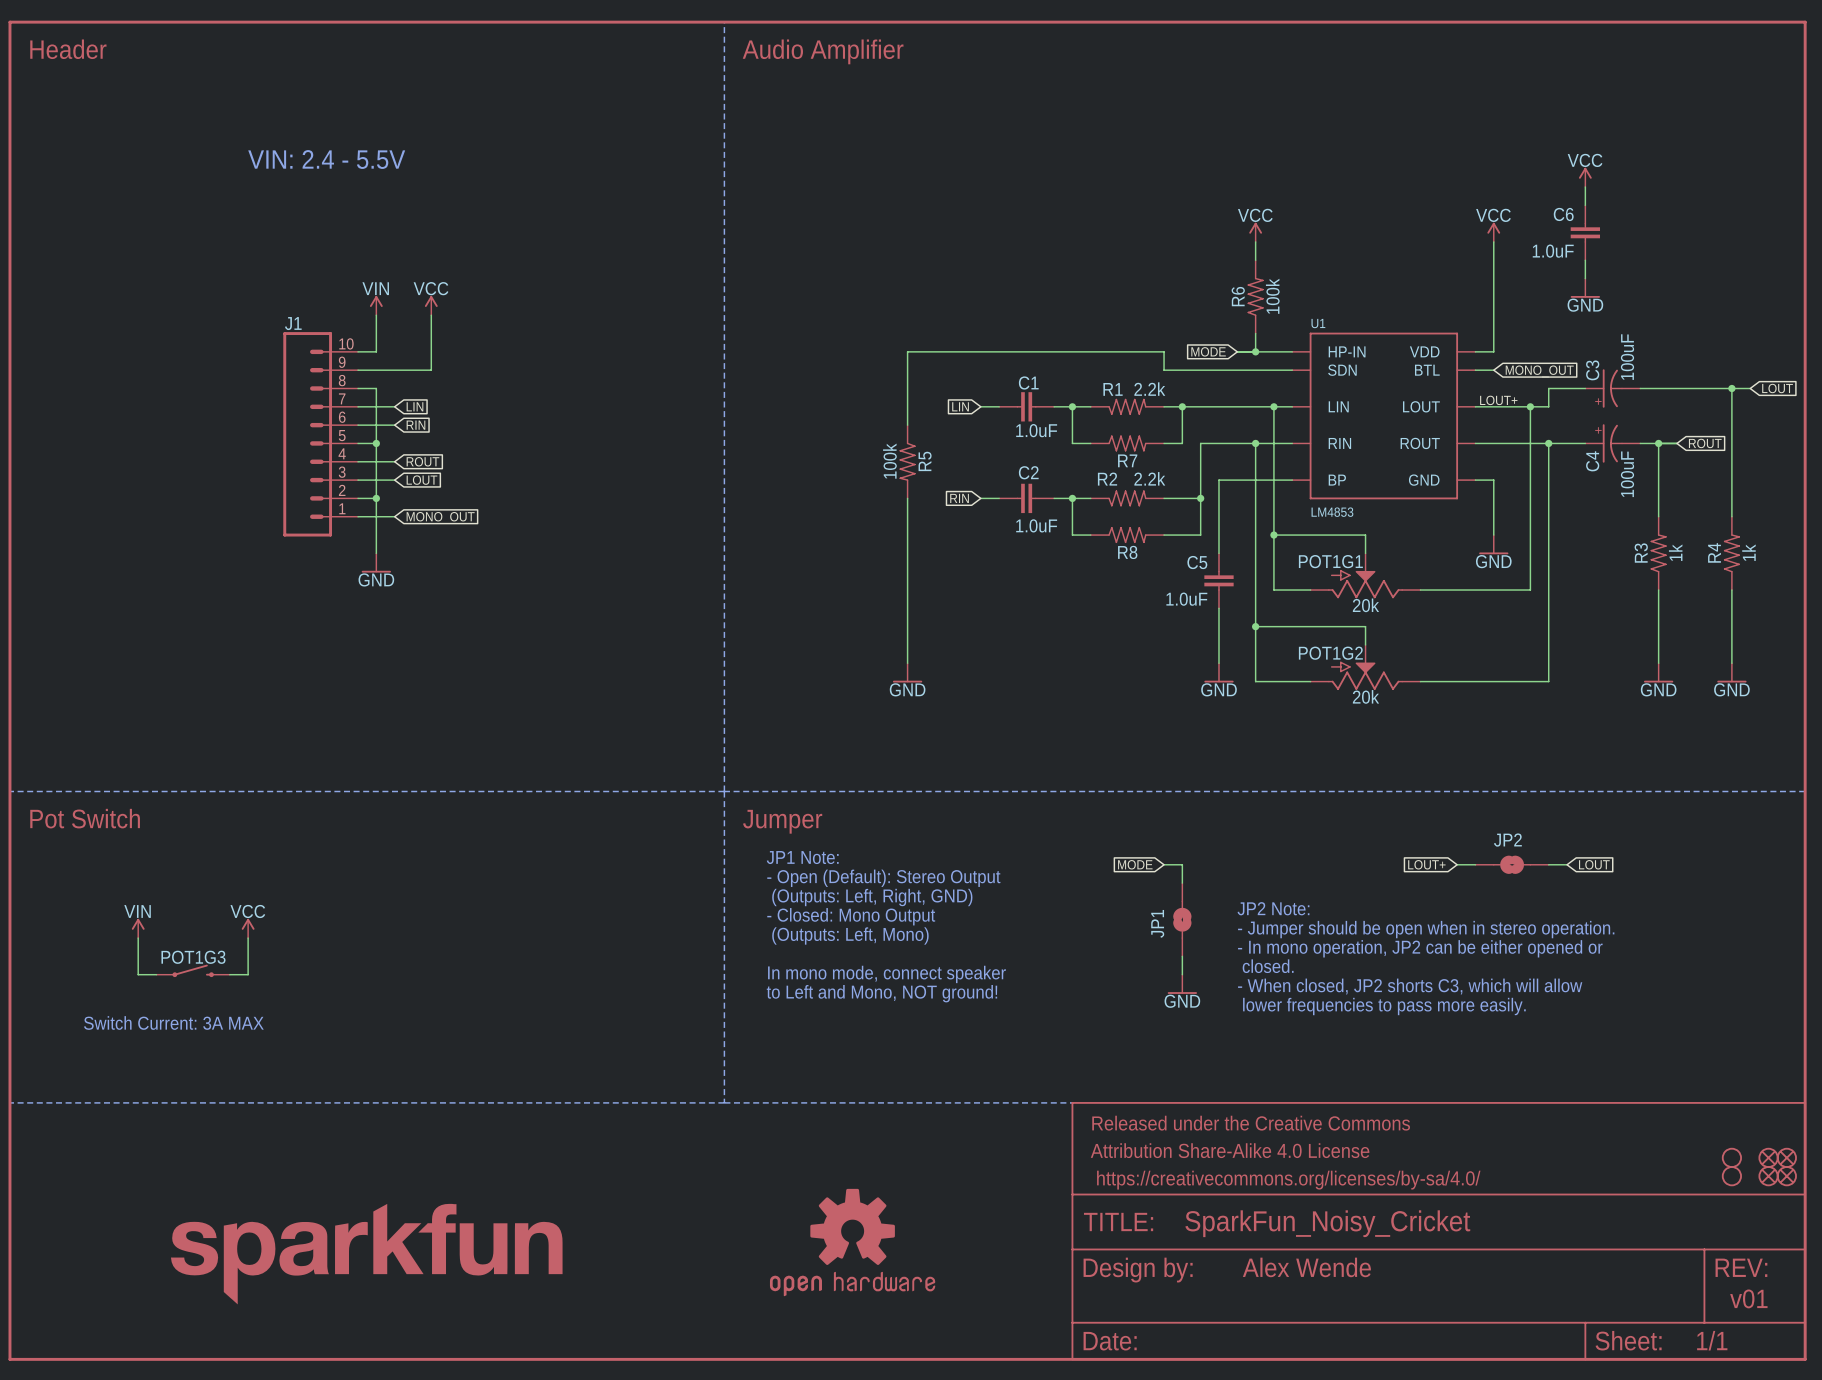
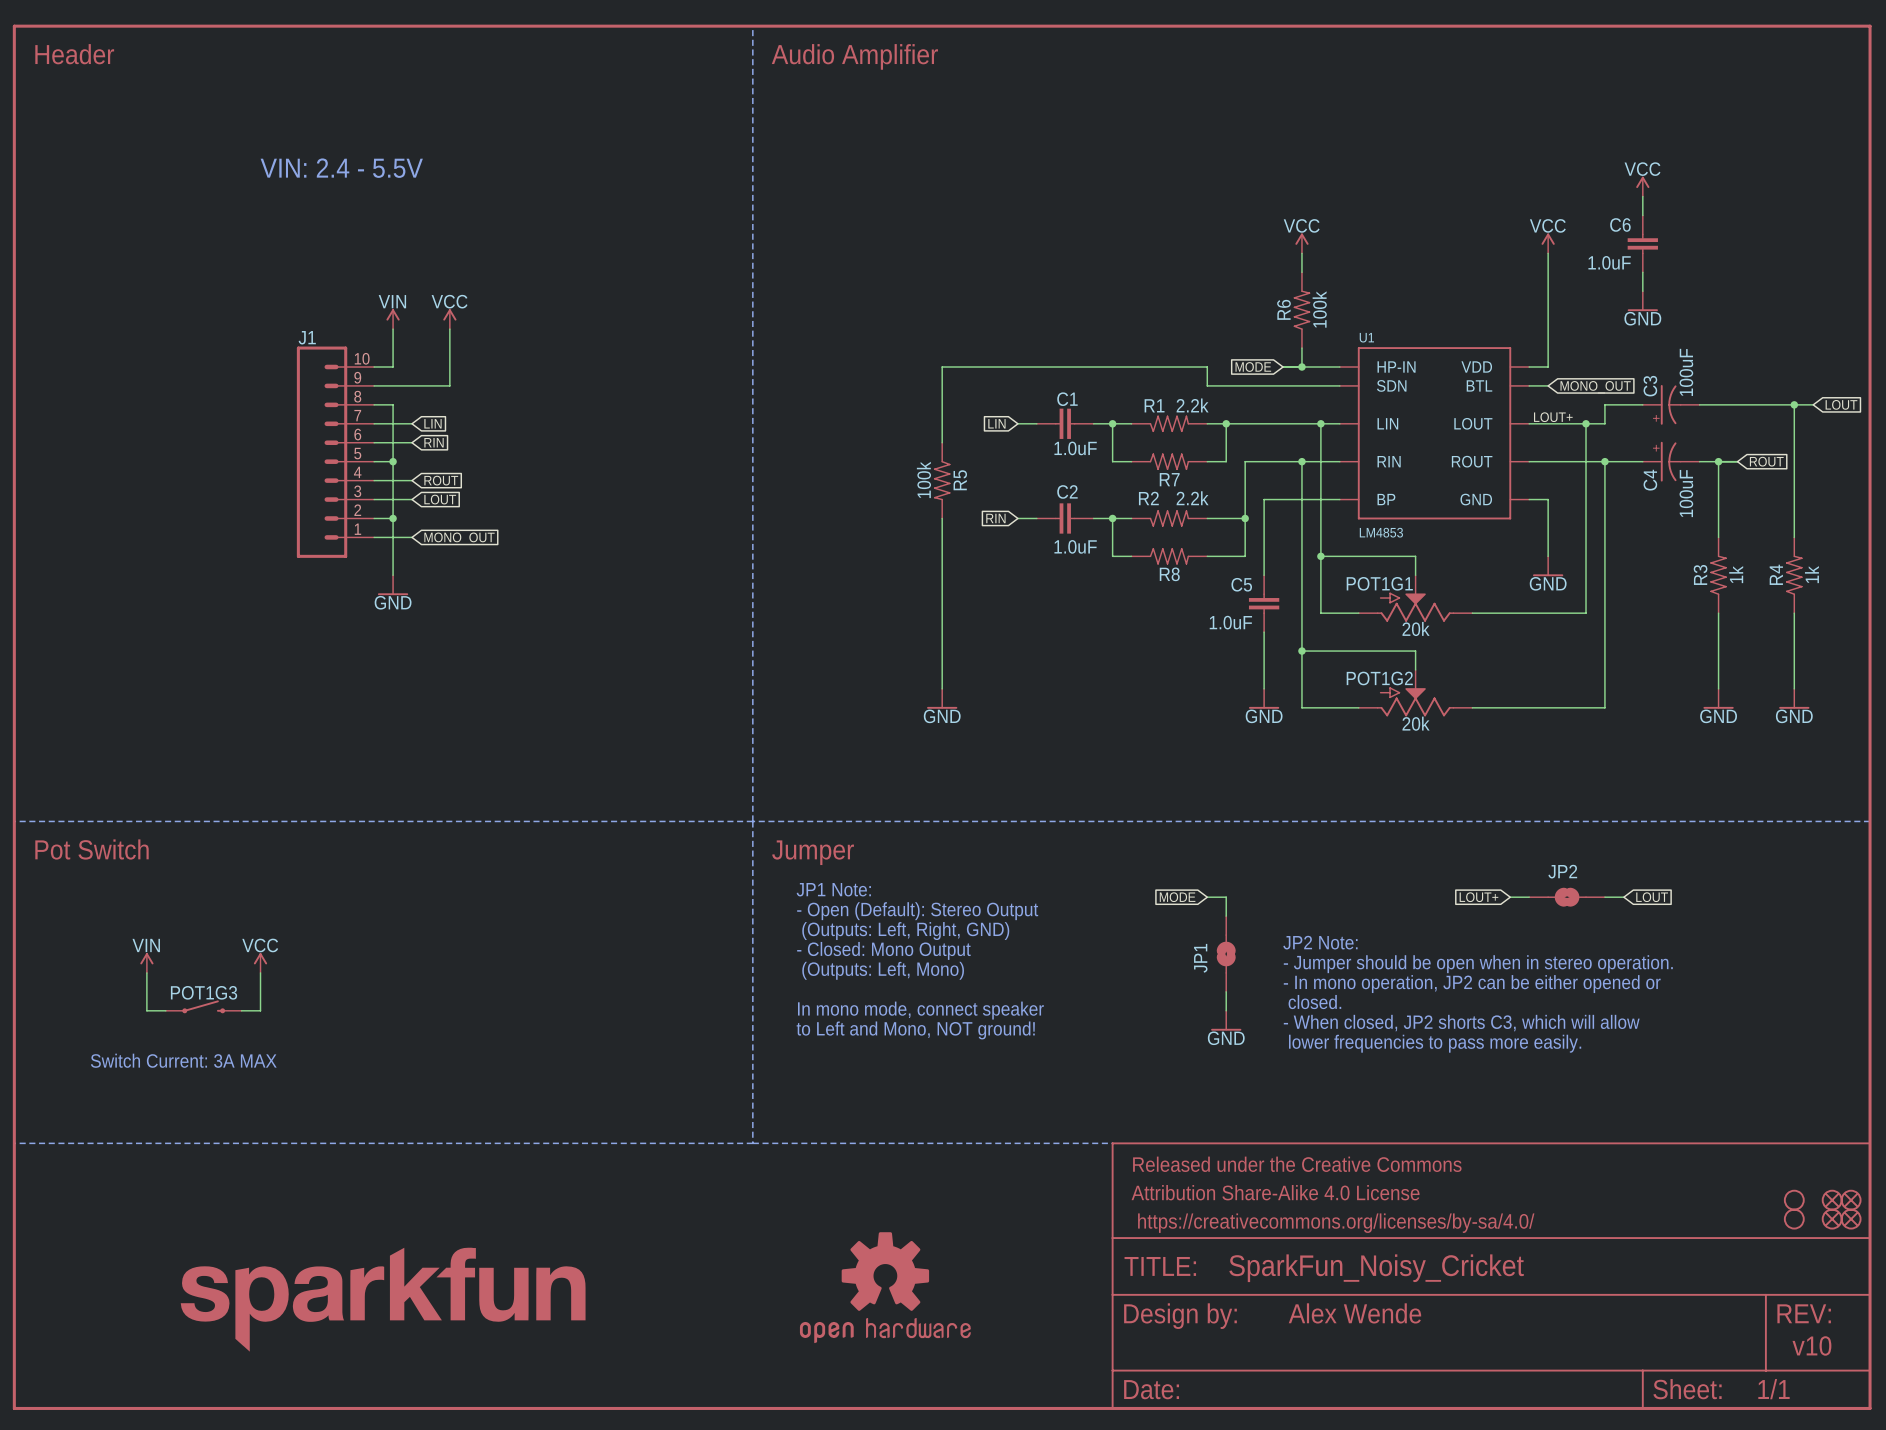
text: v01 (1748, 1298) -> v10 (1811, 1345)

